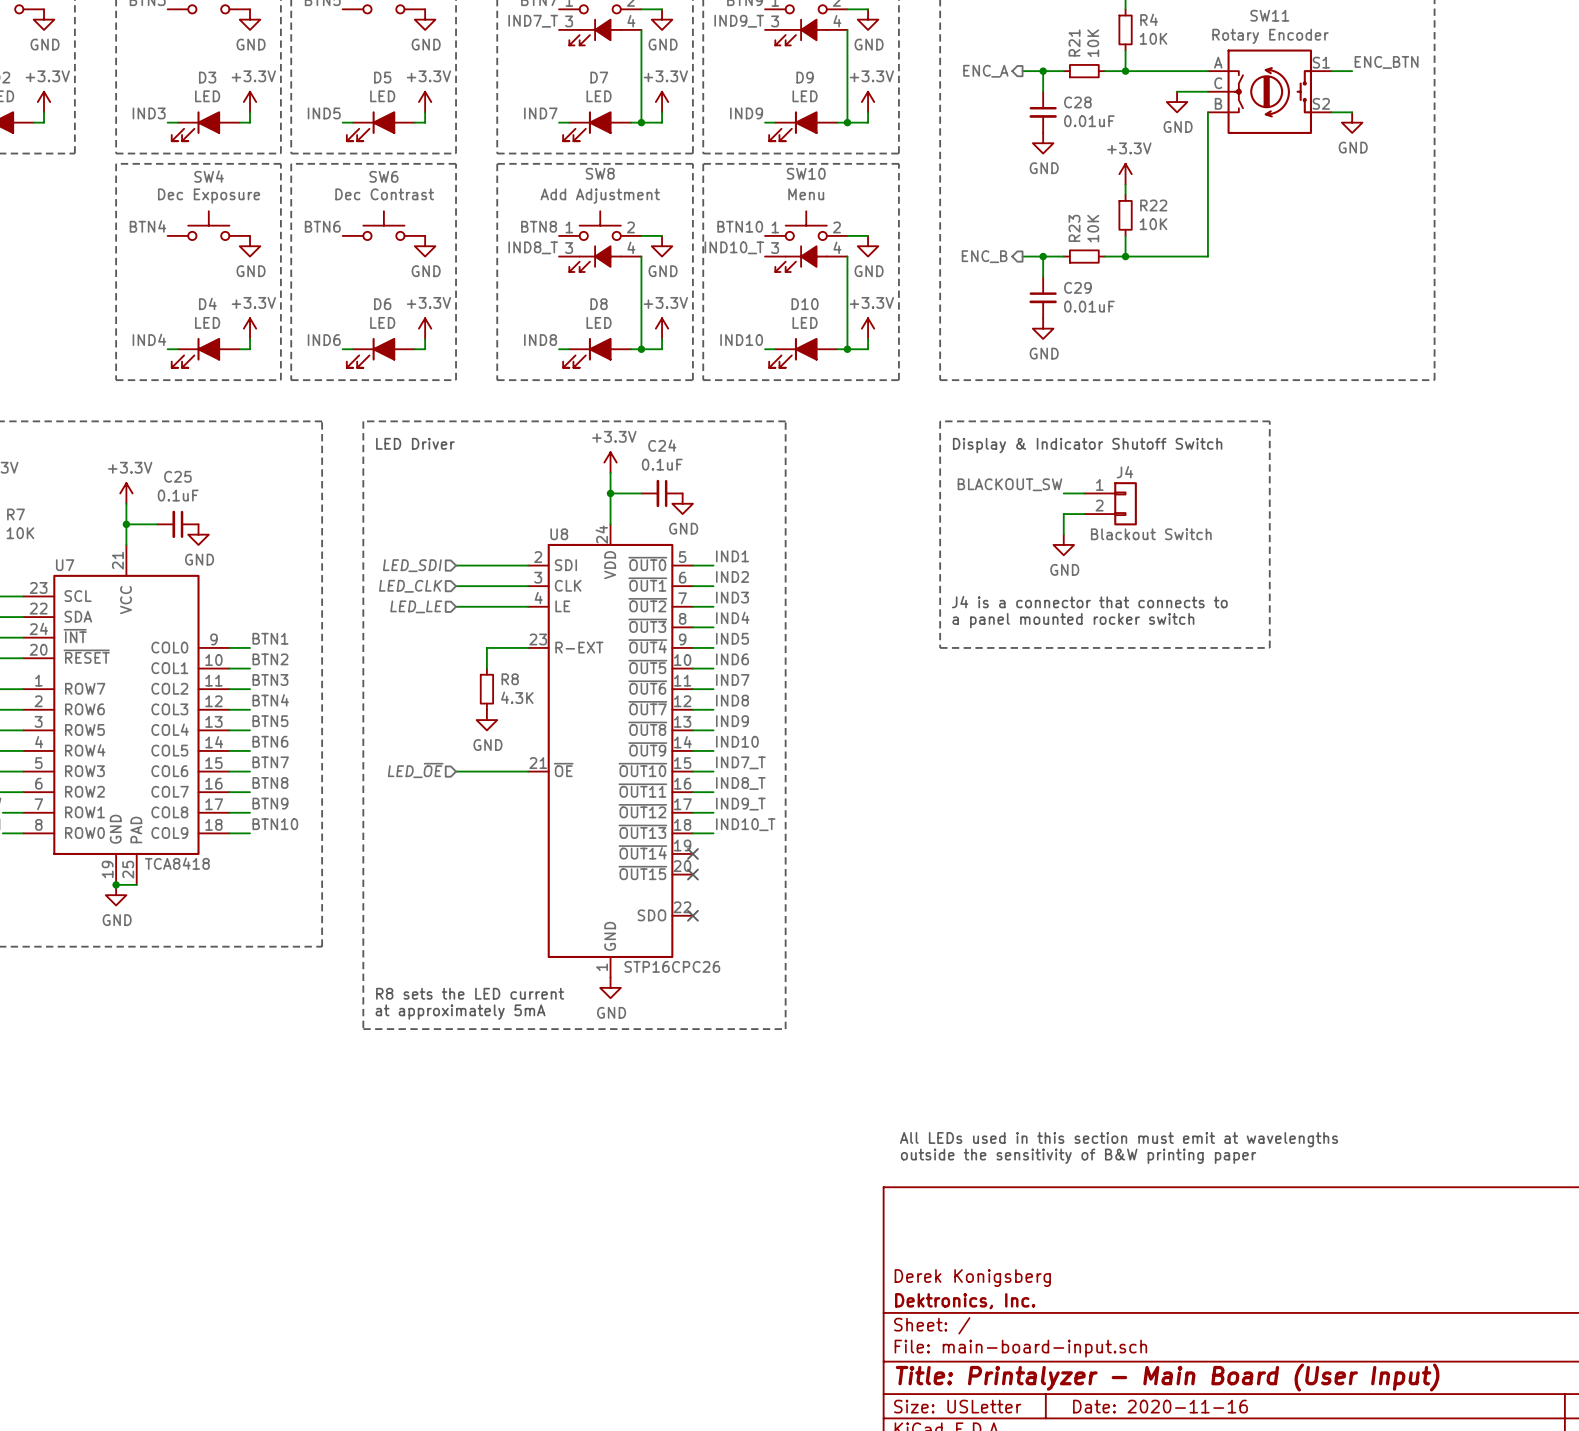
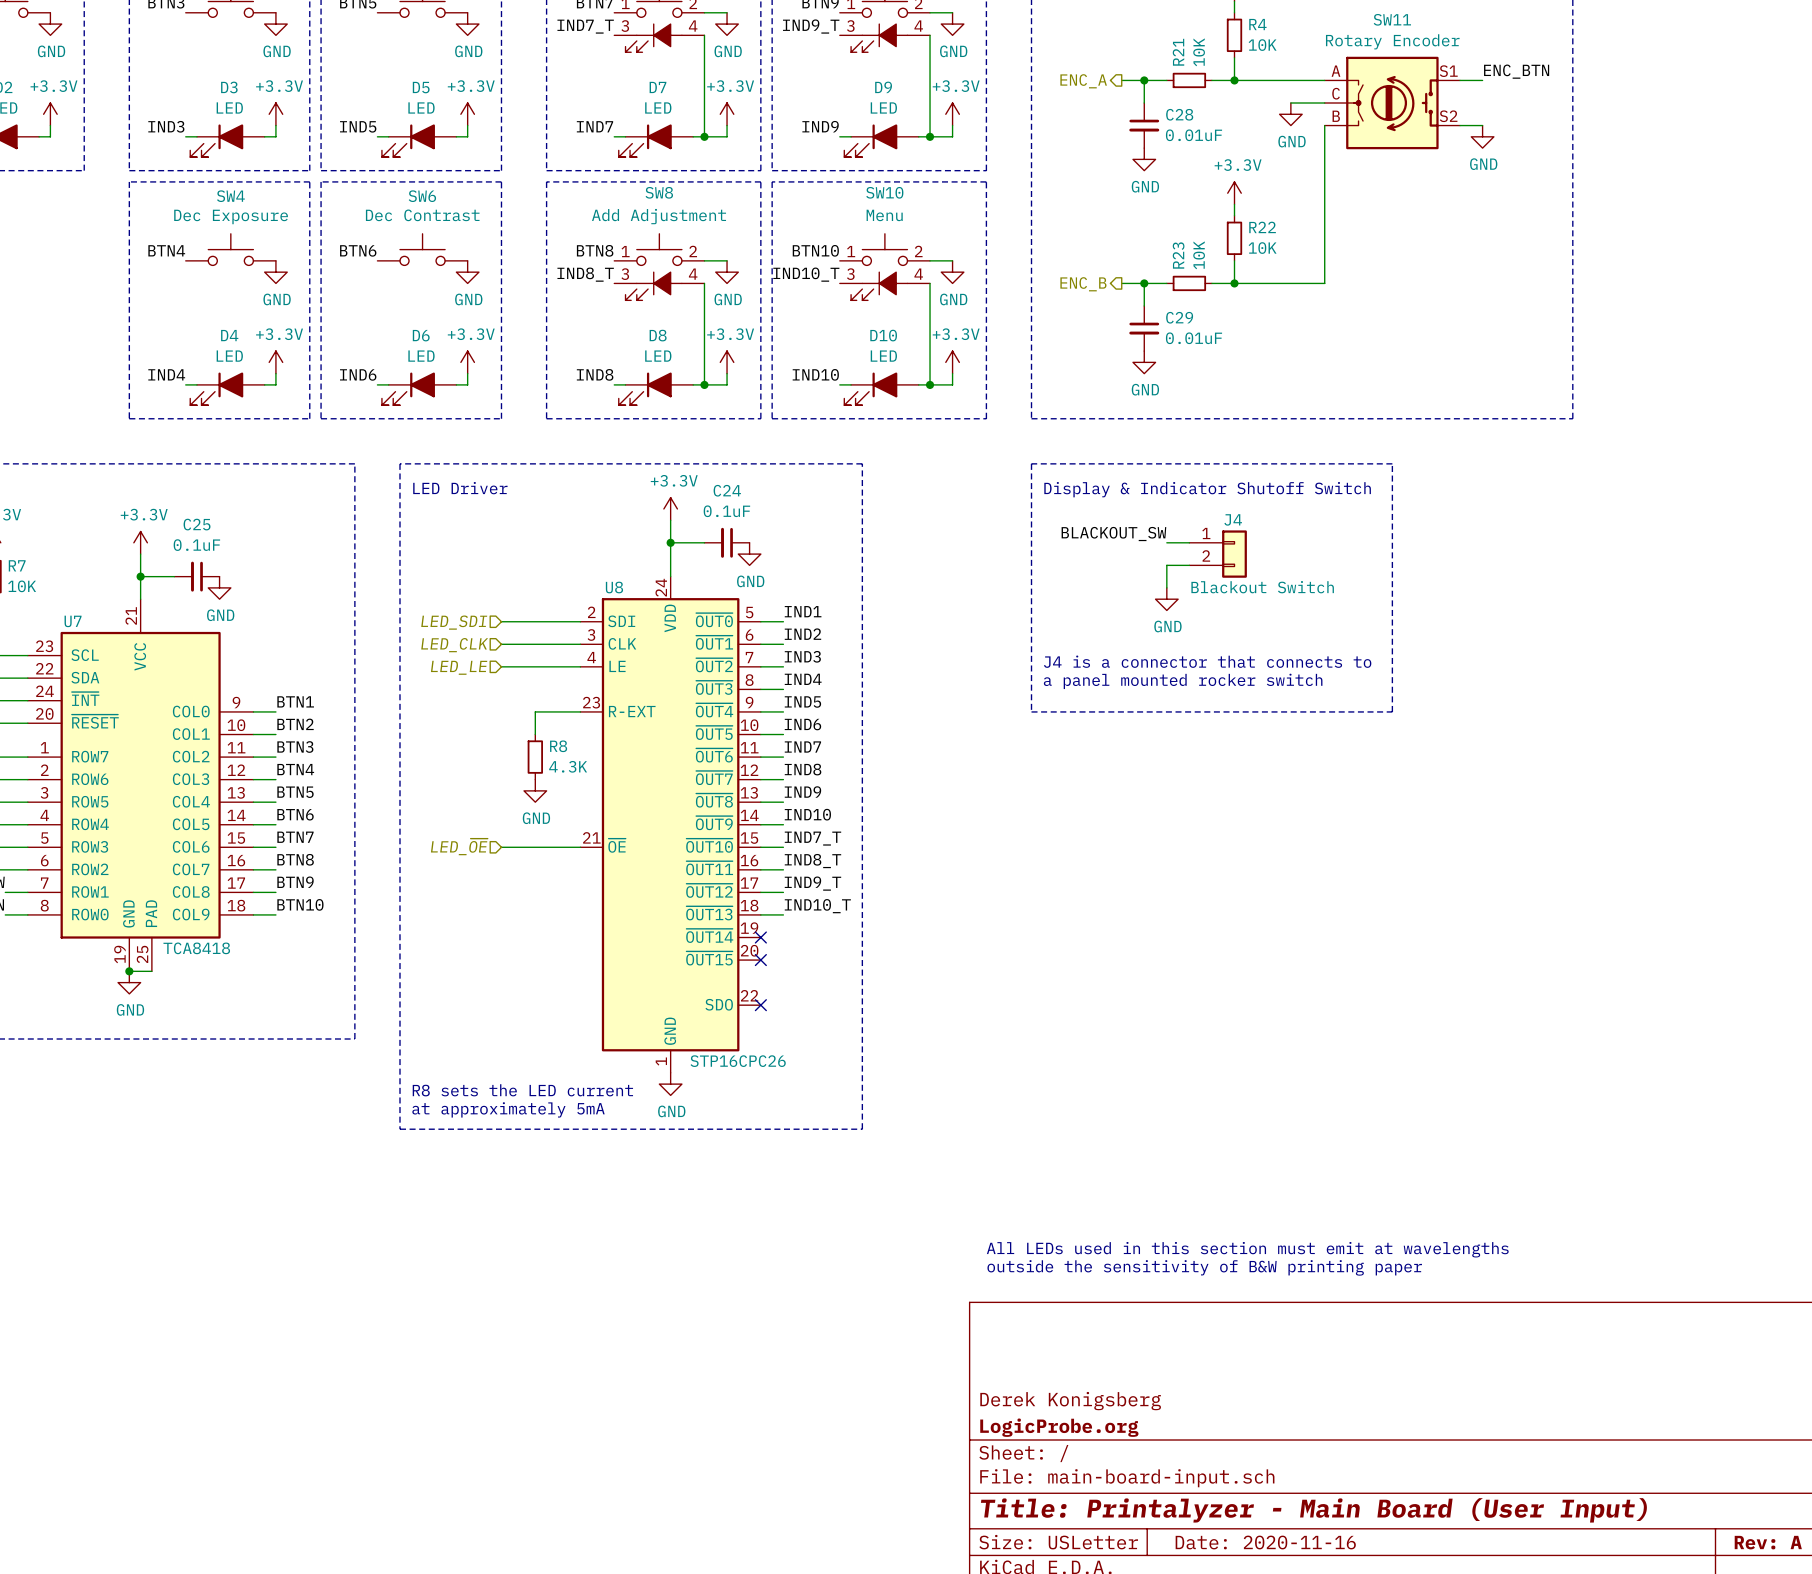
title block: Dektronics, Inc. (965, 1301) -> LogicProbe.org (1059, 1427)

